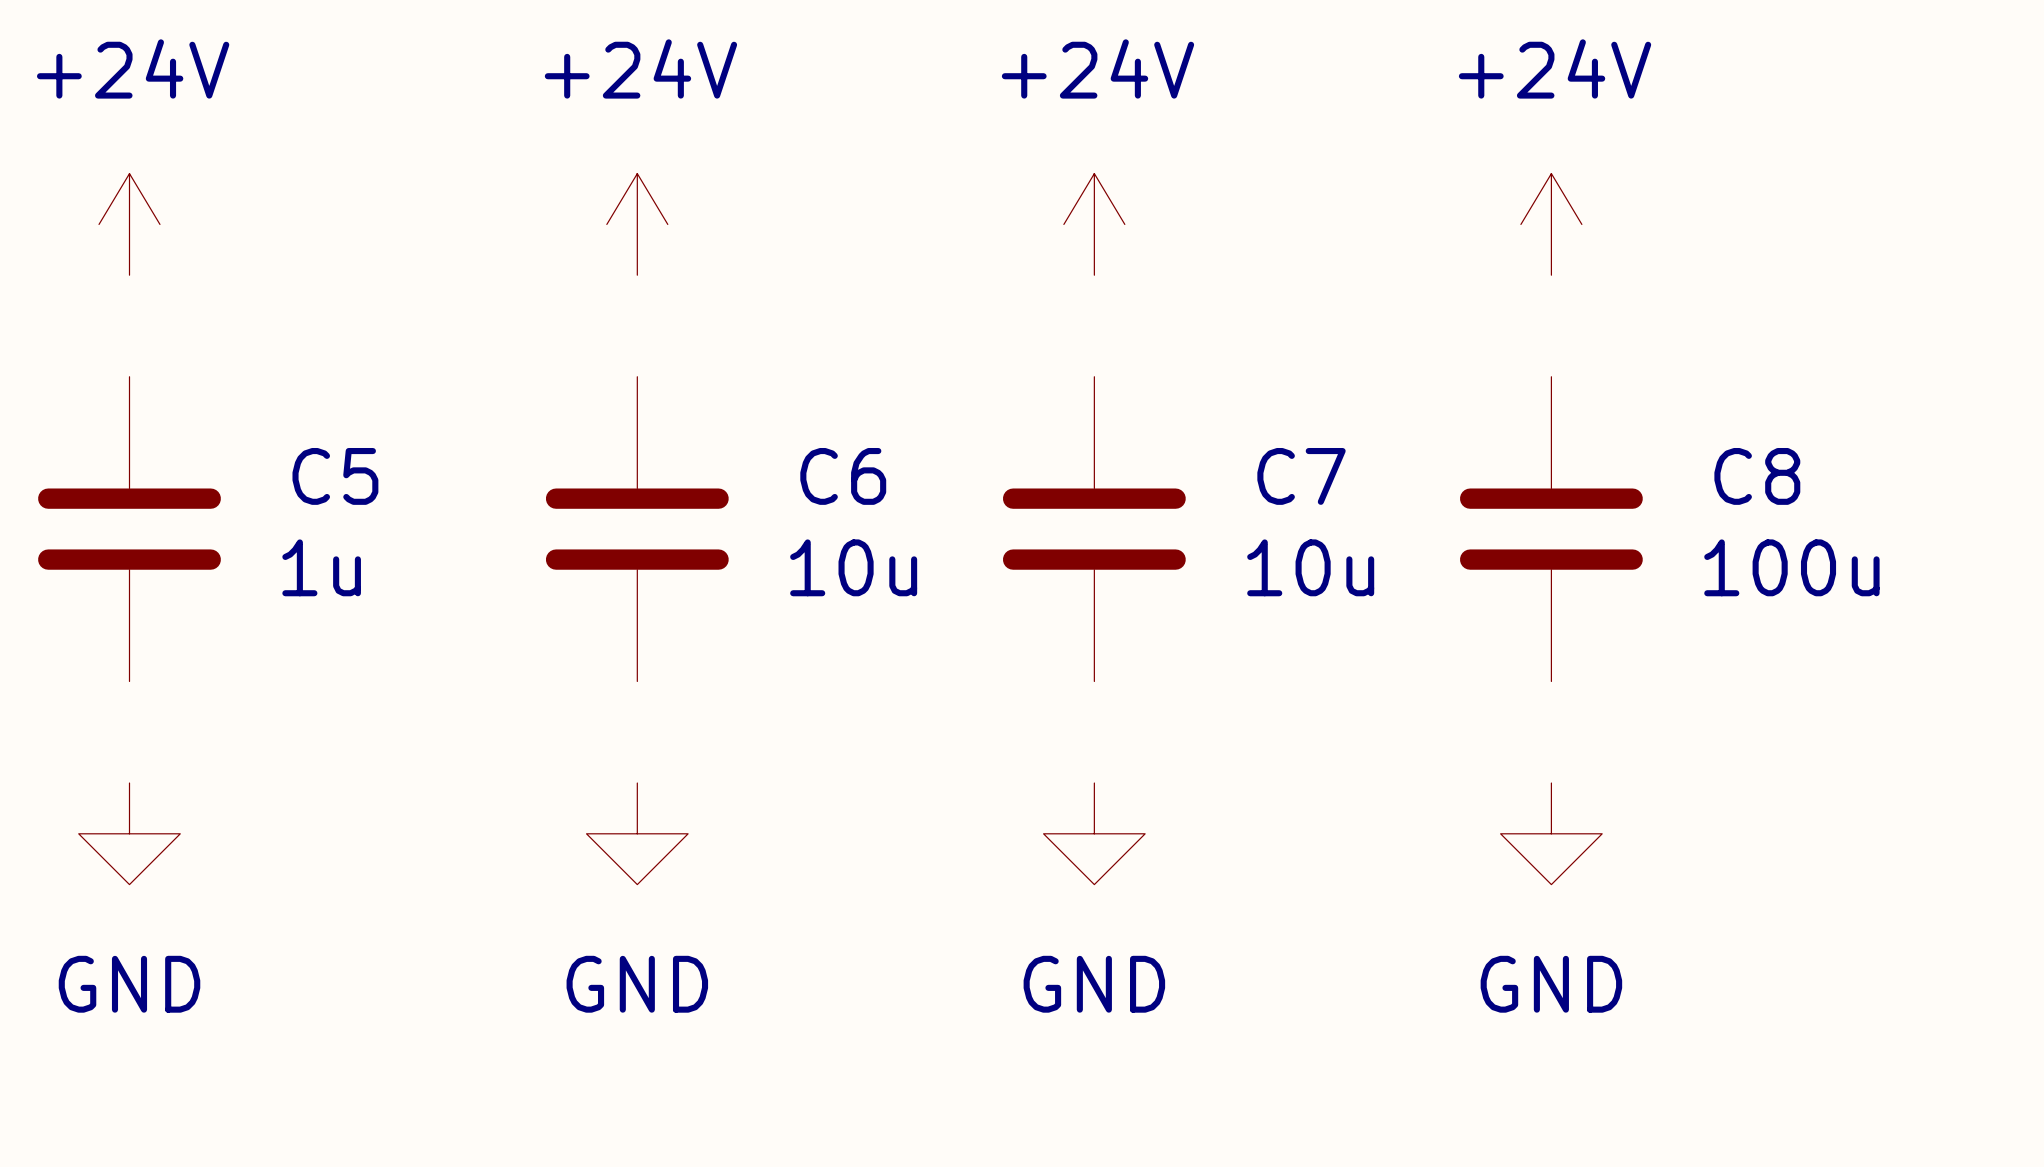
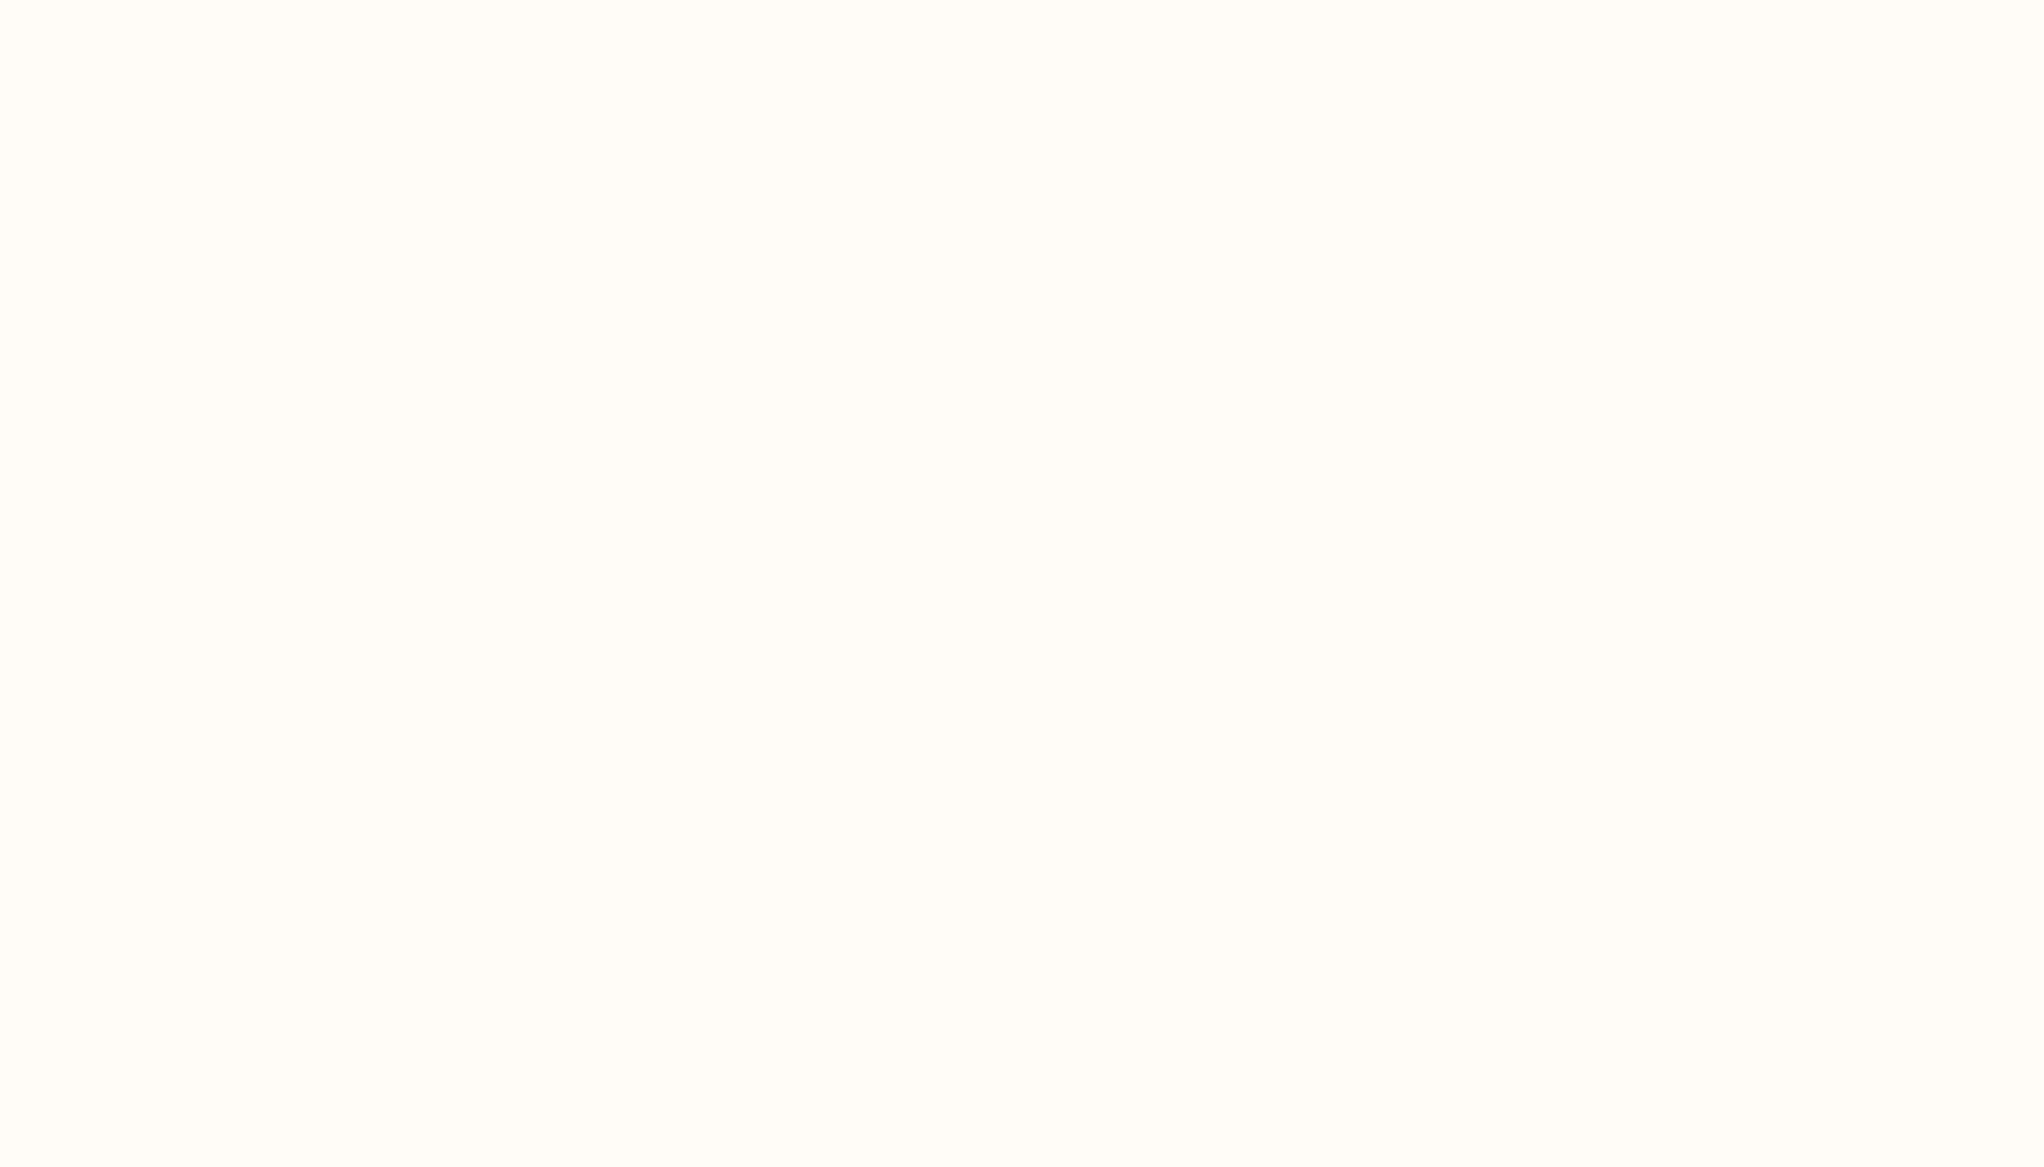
power symbol: +24V (129, 224) -> none
power symbol: +24V (637, 224) -> none
power symbol: +24V (1094, 224) -> none
power symbol: +24V (1551, 224) -> none
C5: 1u (129, 529) -> none
C6: 10u (637, 529) -> none
C7: 10u (1094, 529) -> none
C8: 100u (1551, 529) -> none
power symbol: GND (129, 833) -> none
power symbol: GND (637, 833) -> none
power symbol: GND (1094, 833) -> none
power symbol: GND (1551, 833) -> none

